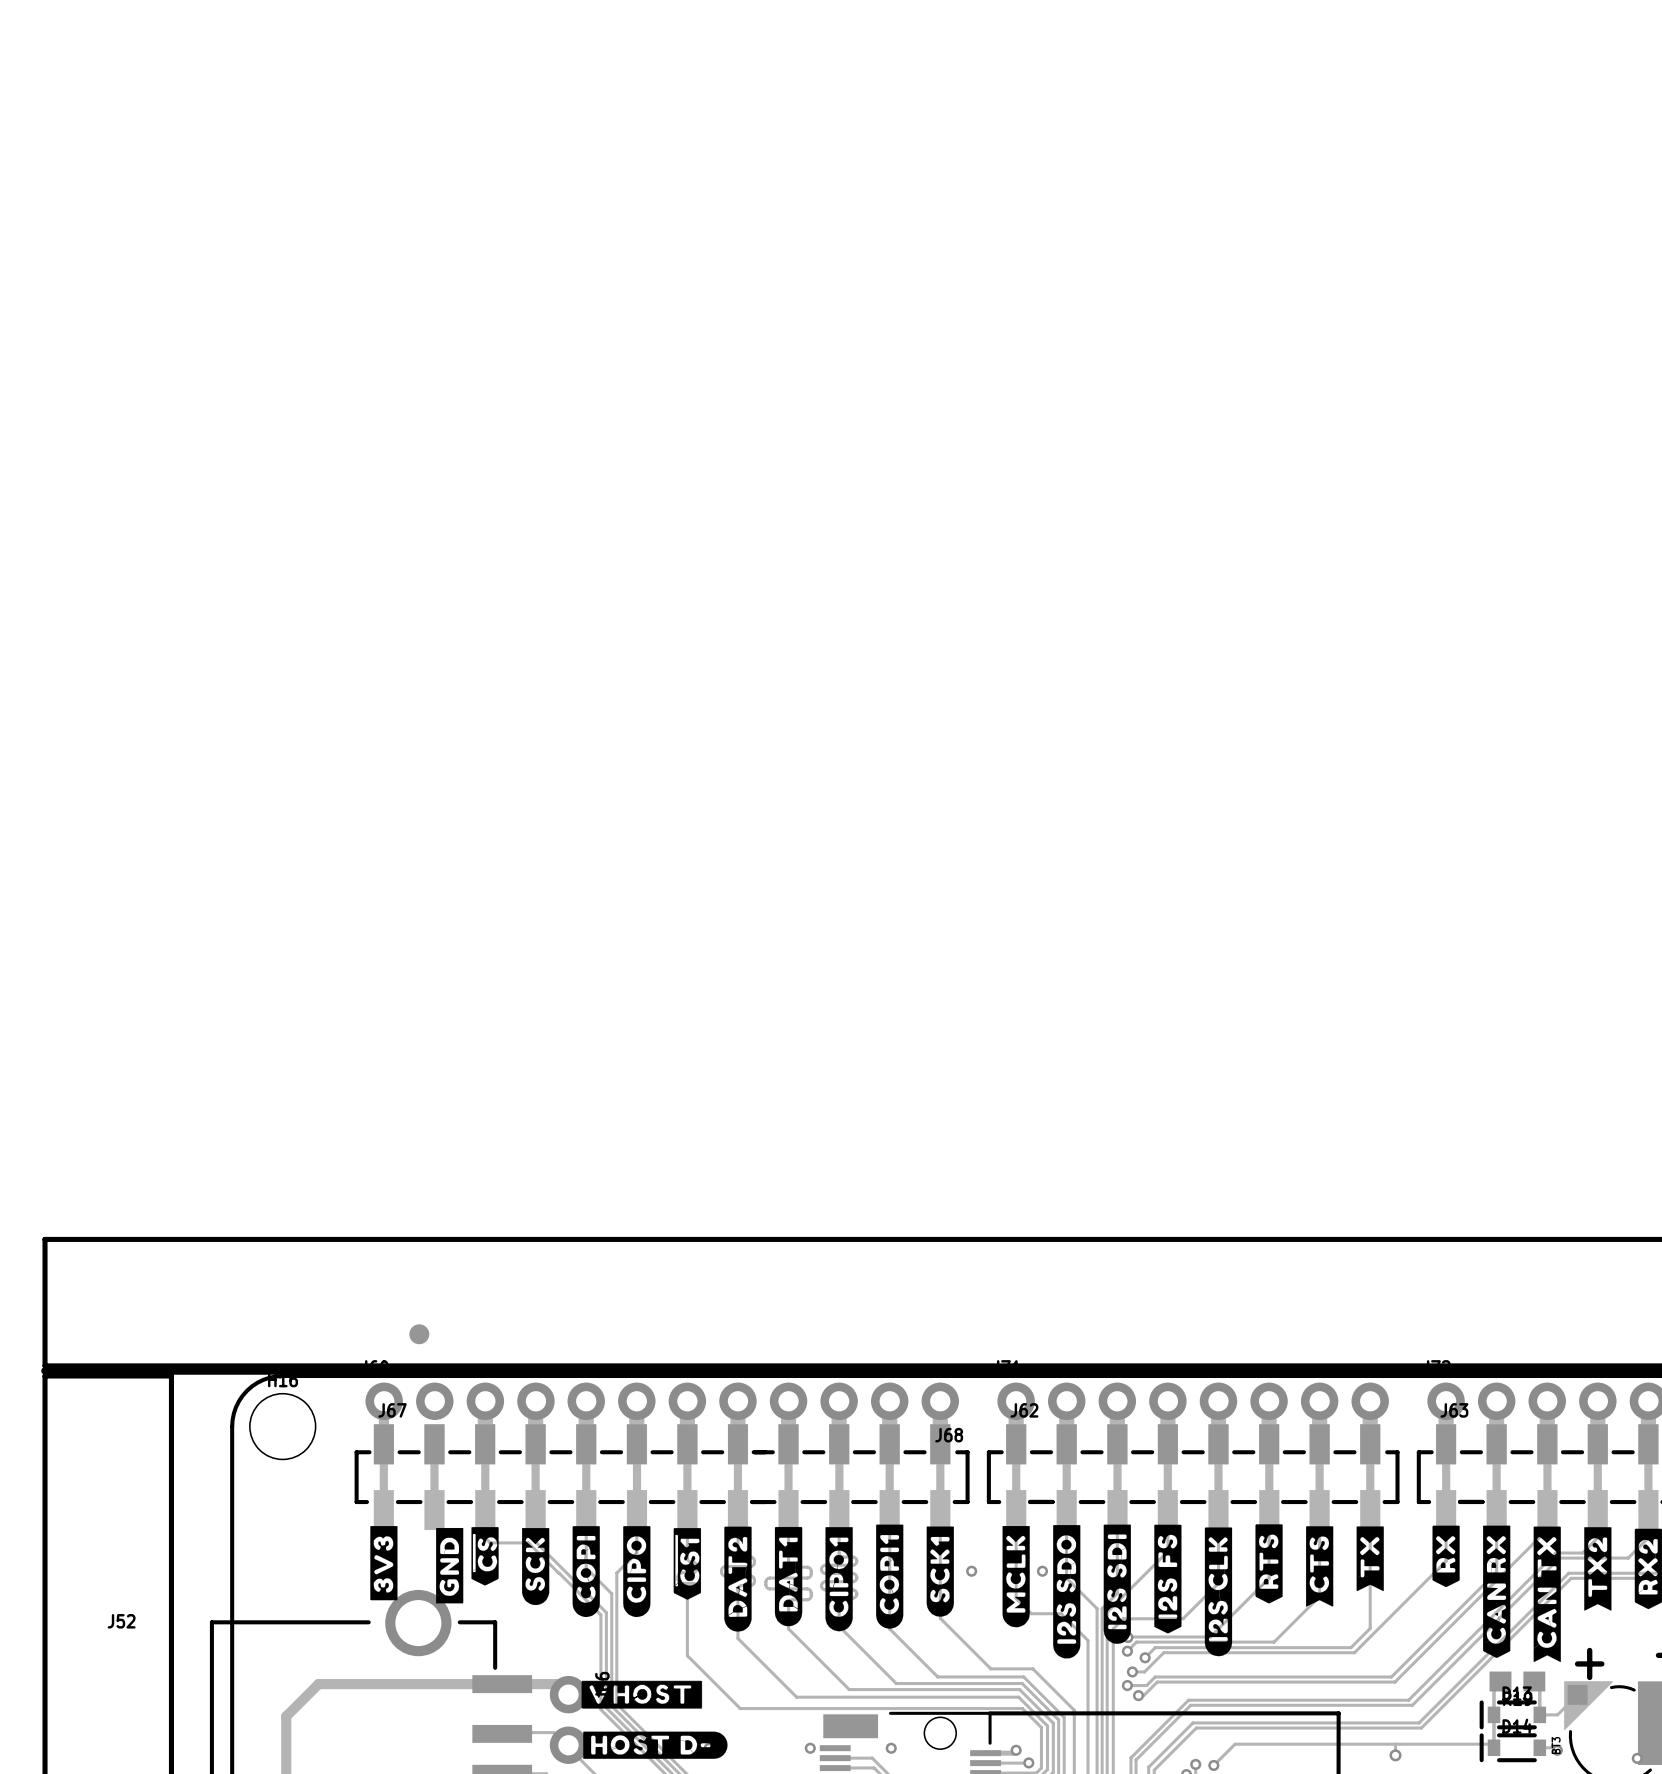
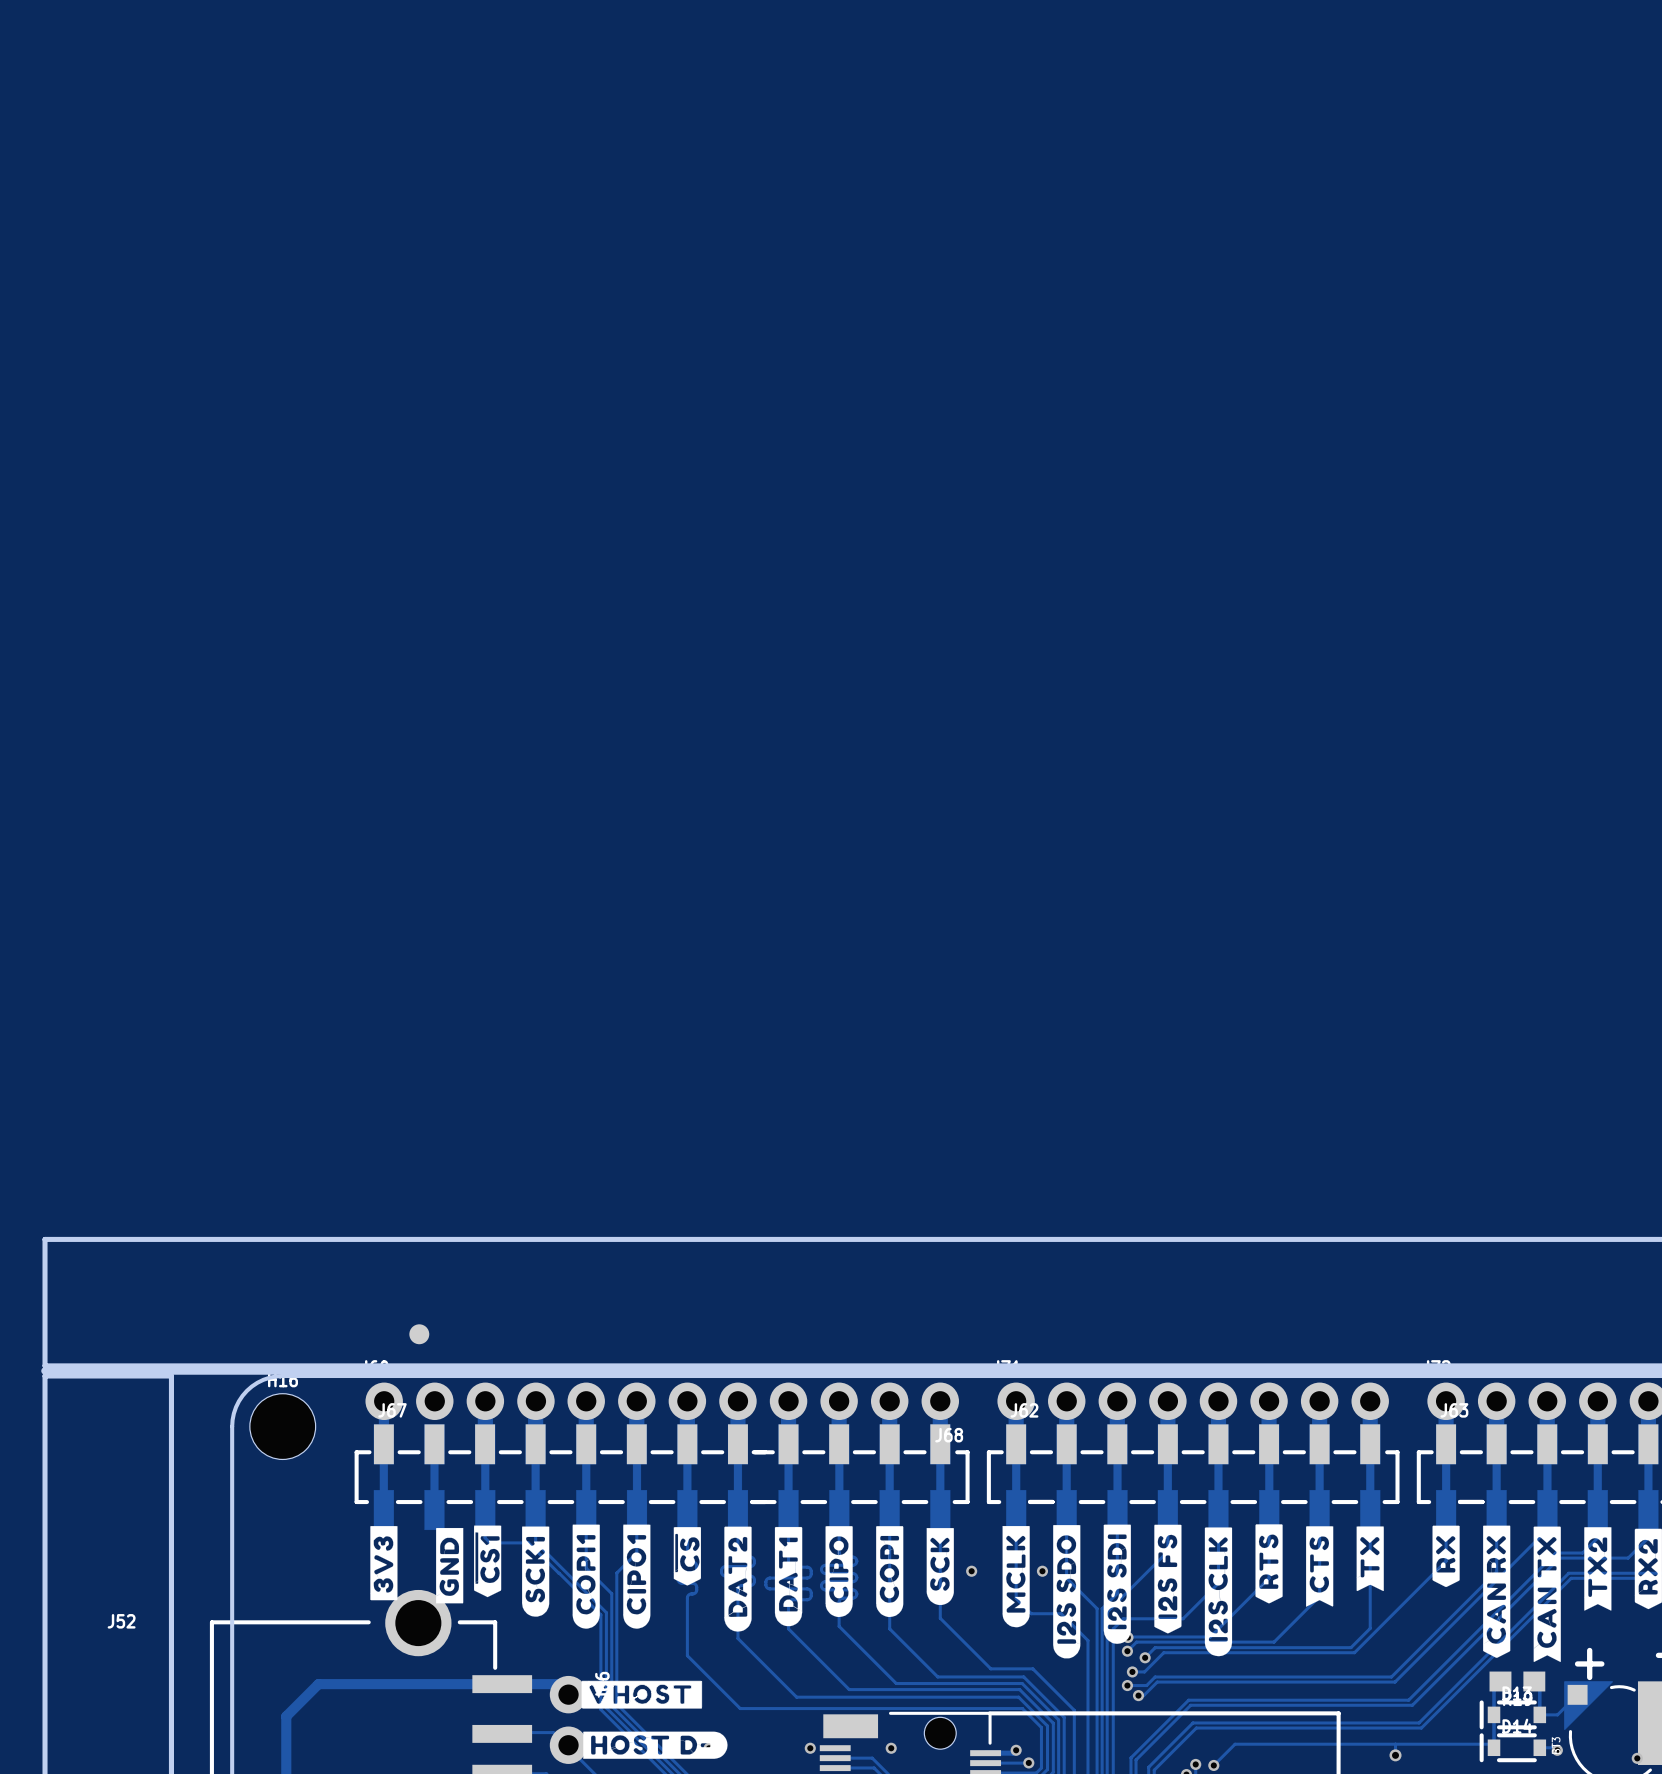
drawing position: (485, 1556) -> (687, 1556)
drawing position: (687, 1563) -> (487, 1561)
drawing position: (535, 1566) -> (940, 1566)
drawing position: (586, 1571) -> (889, 1571)
drawing position: (636, 1571) -> (839, 1571)
drawing position: (940, 1571) -> (535, 1571)
drawing position: (889, 1576) -> (586, 1576)
drawing position: (839, 1579) -> (636, 1576)

